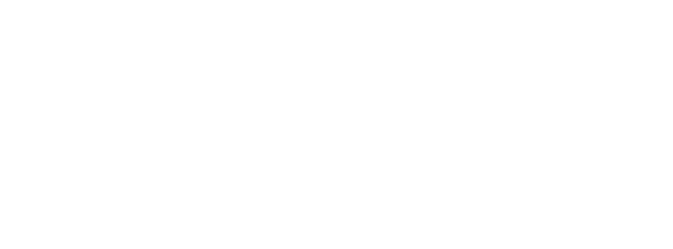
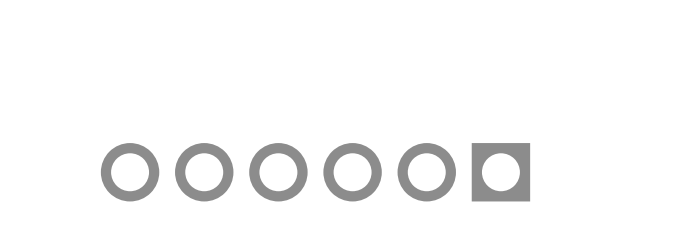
part: none -> (315, 172)

